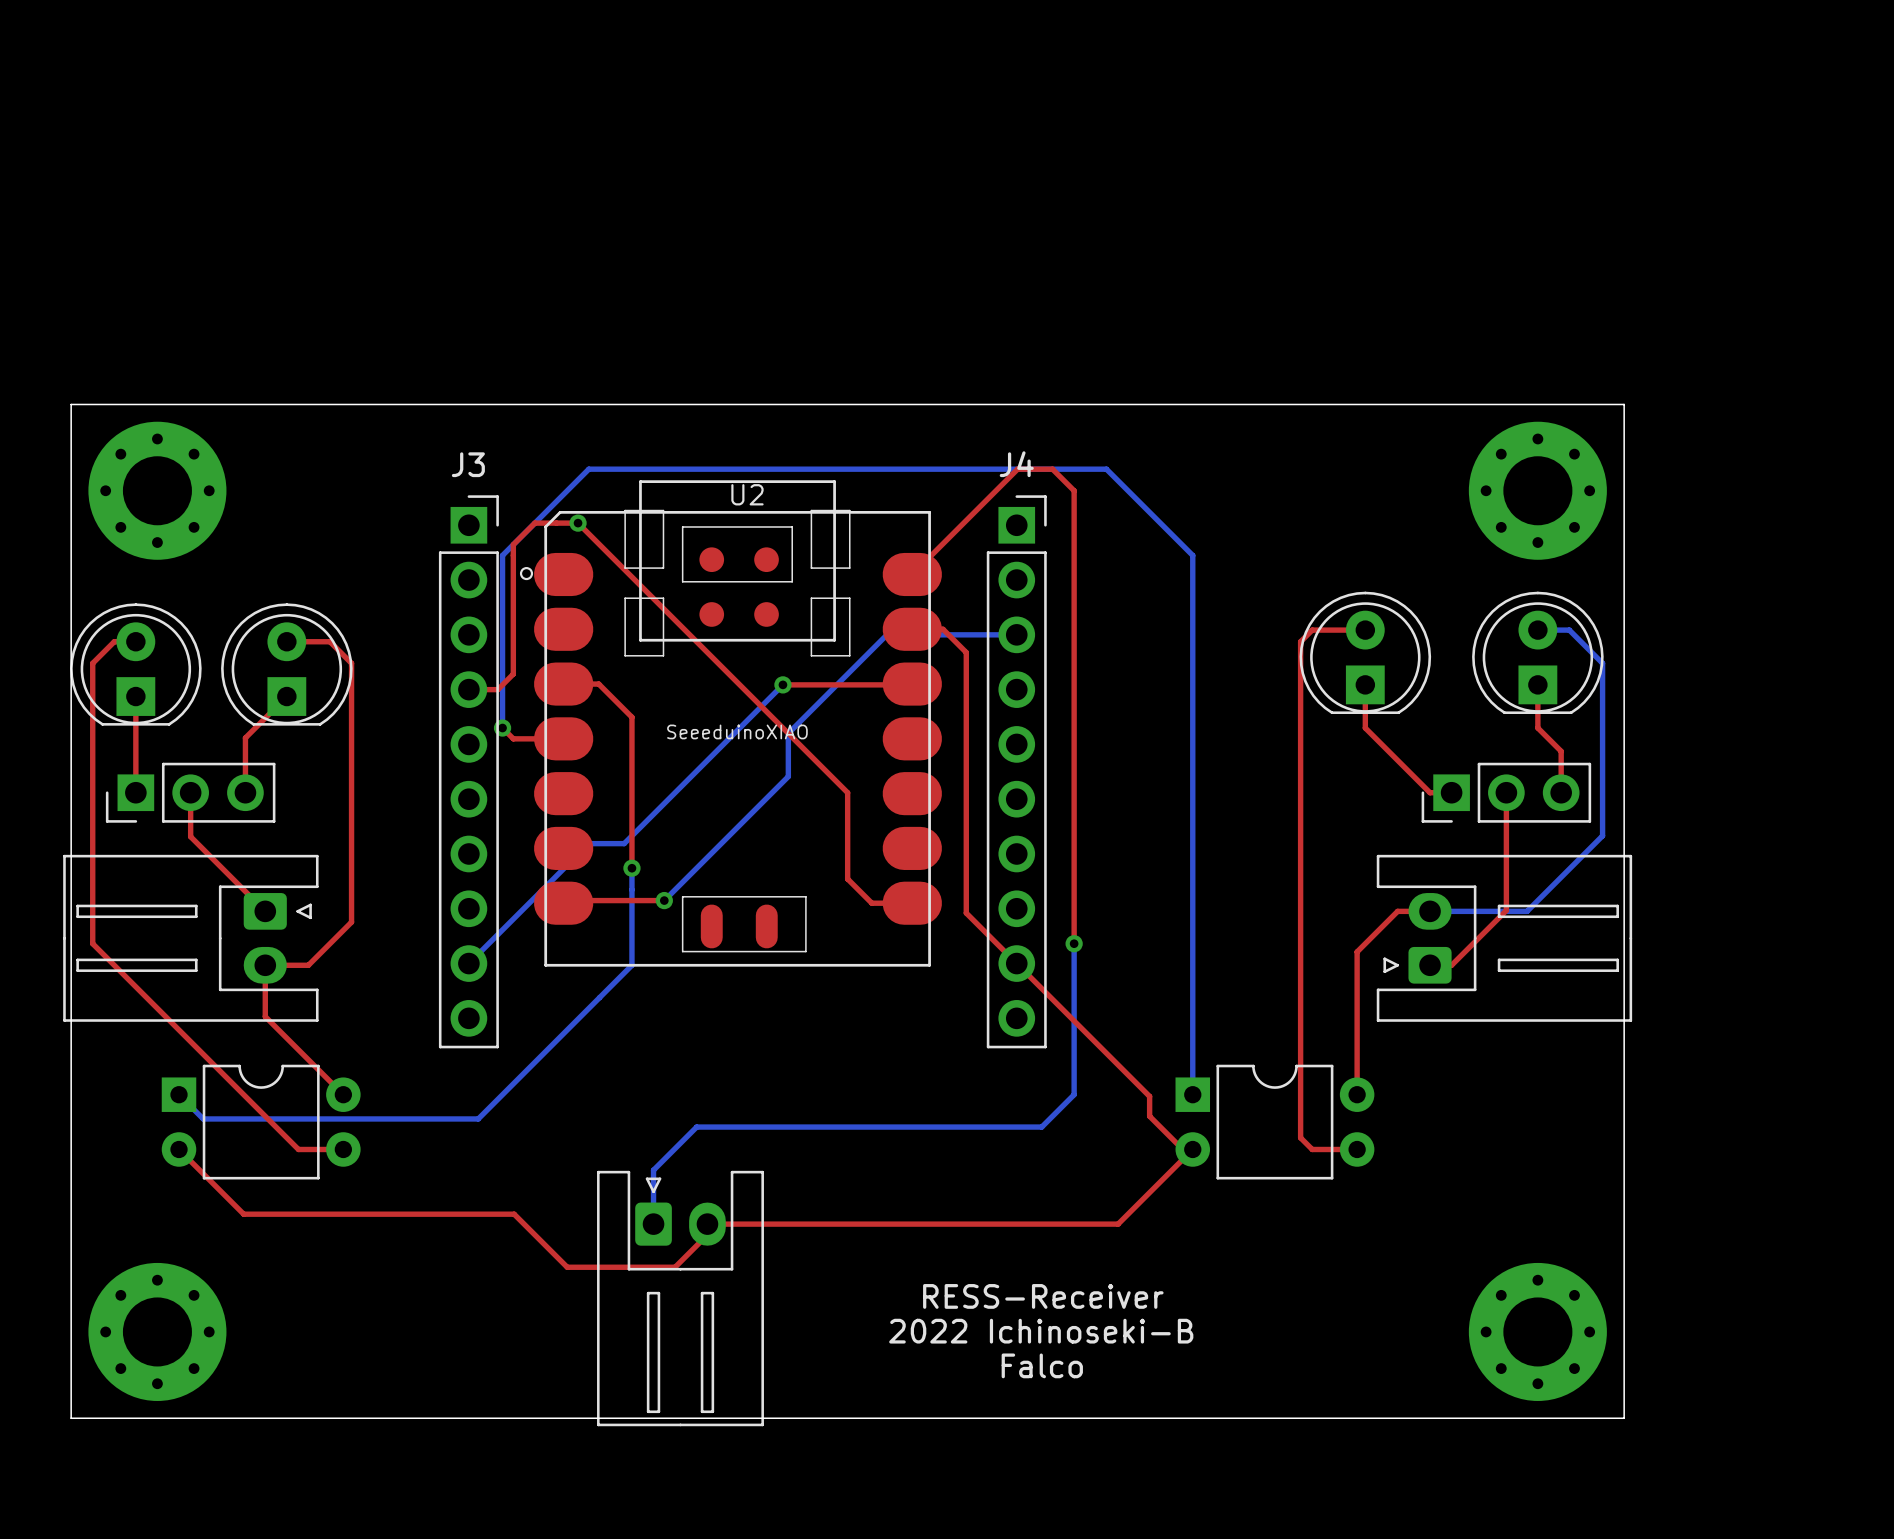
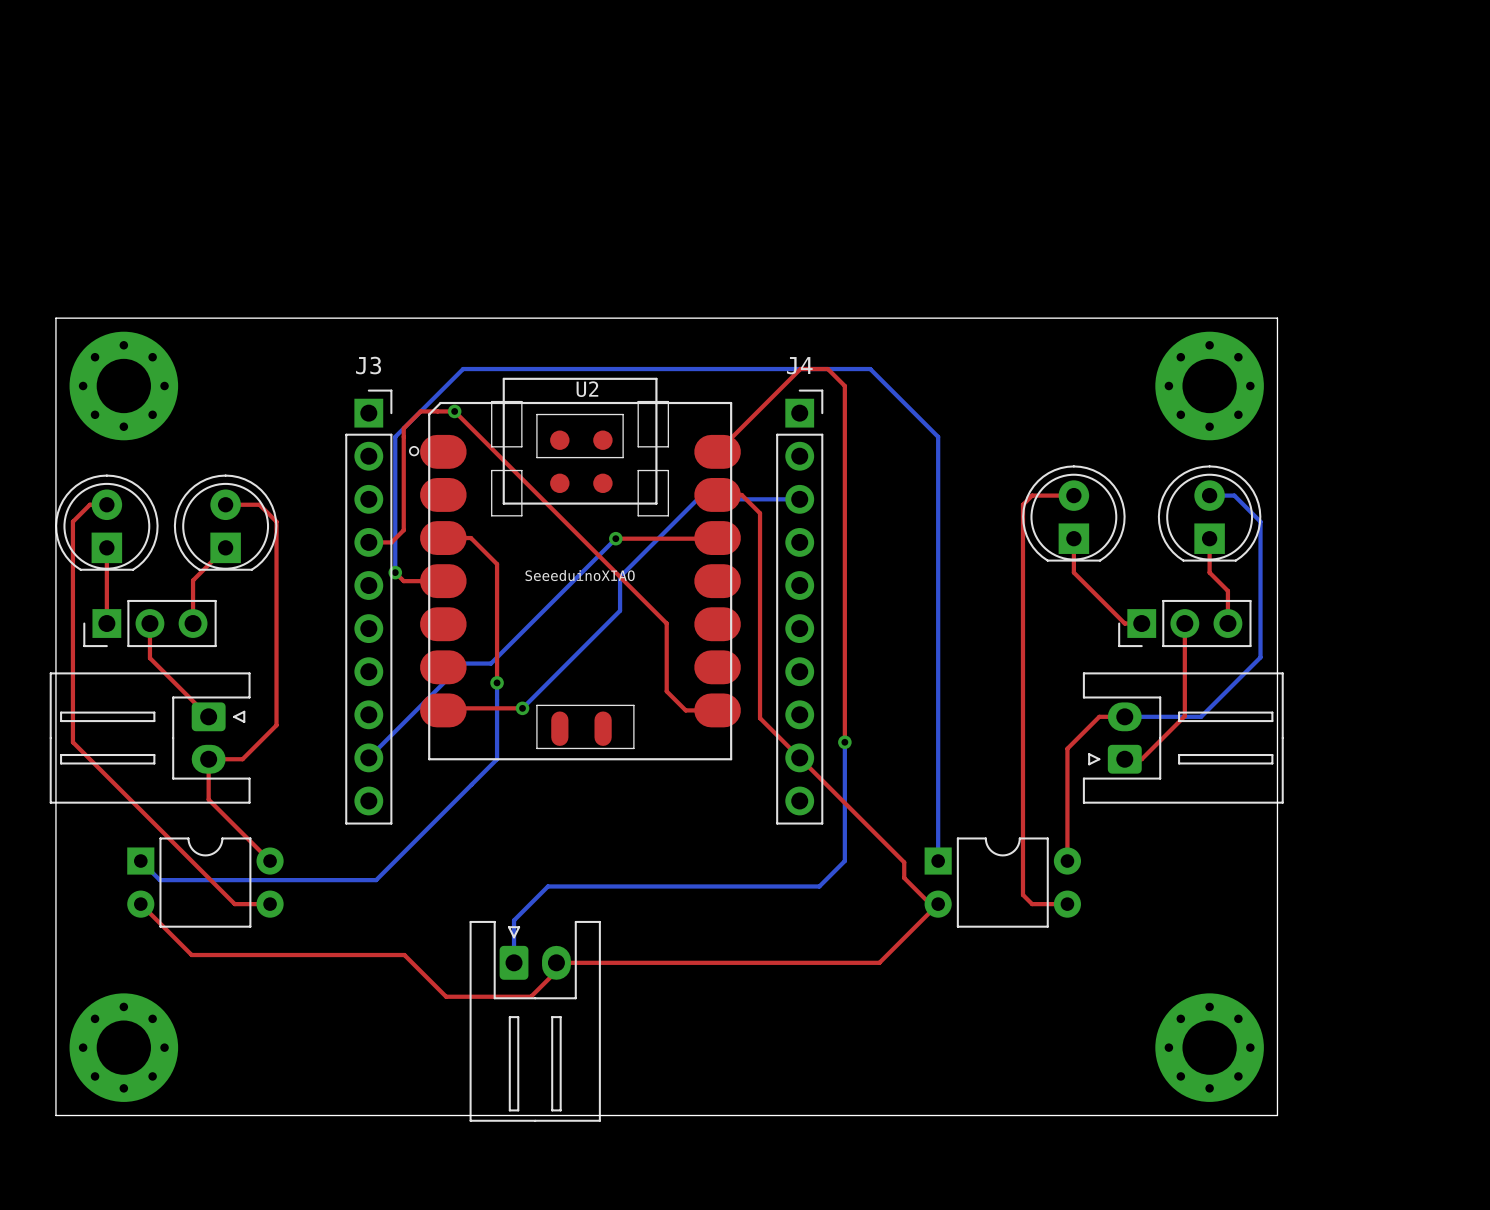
text: RESS-Receiver (1043, 1296) -> none
text: 2022 Ichinoseki-B (1041, 1331) -> none
text: Falco (1042, 1365) -> none

